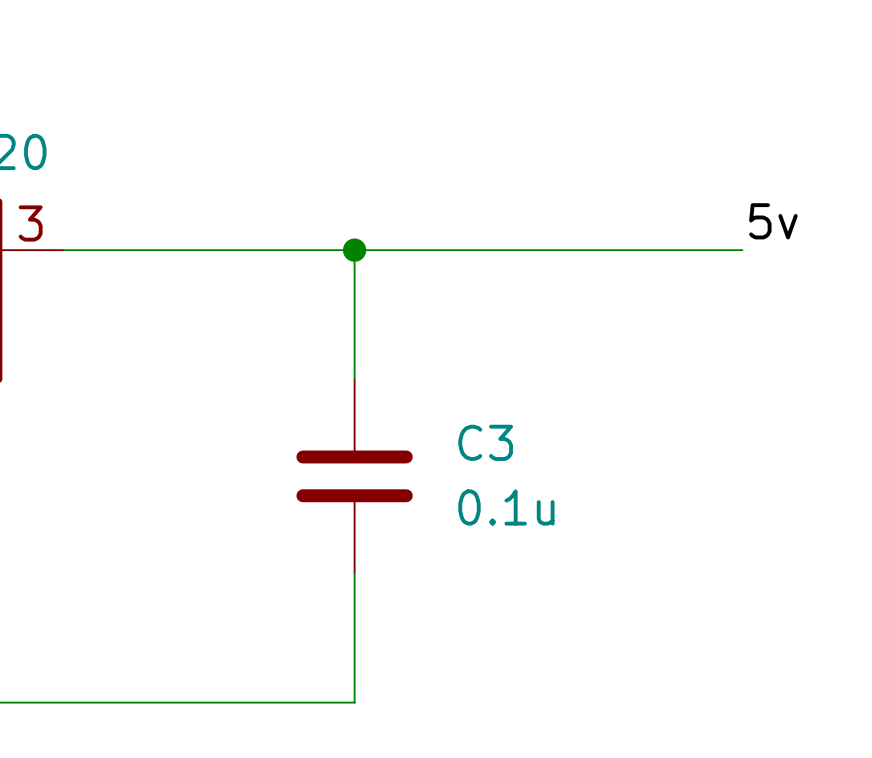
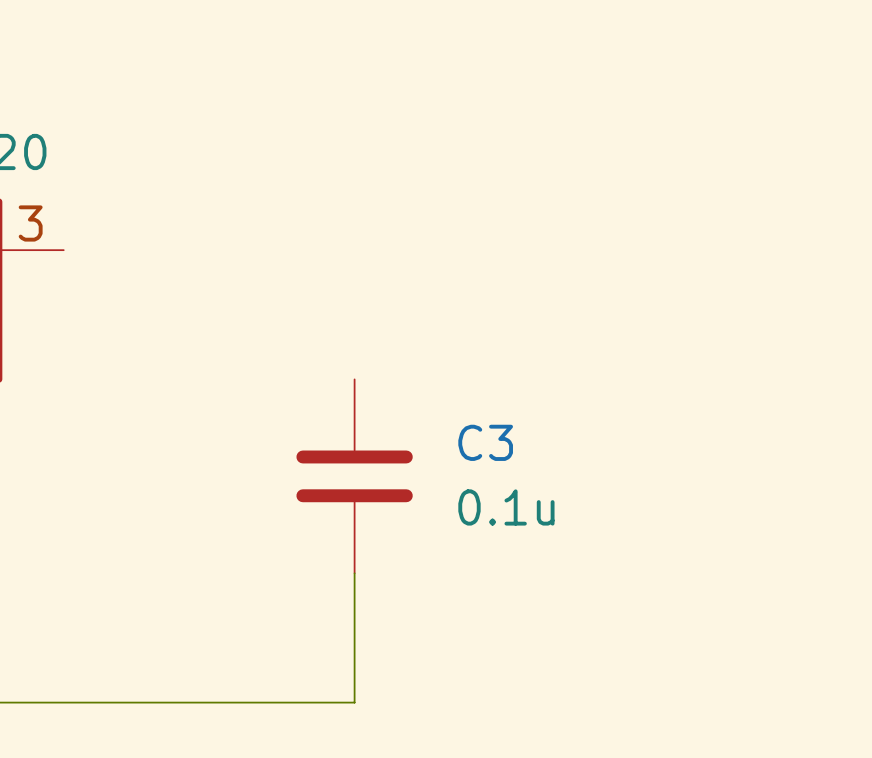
label: 5v (773, 221) -> none
wire: (63, 250) (742, 250) -> none
wire: (354, 250) (354, 379) -> none
junction: (354, 250) -> none

